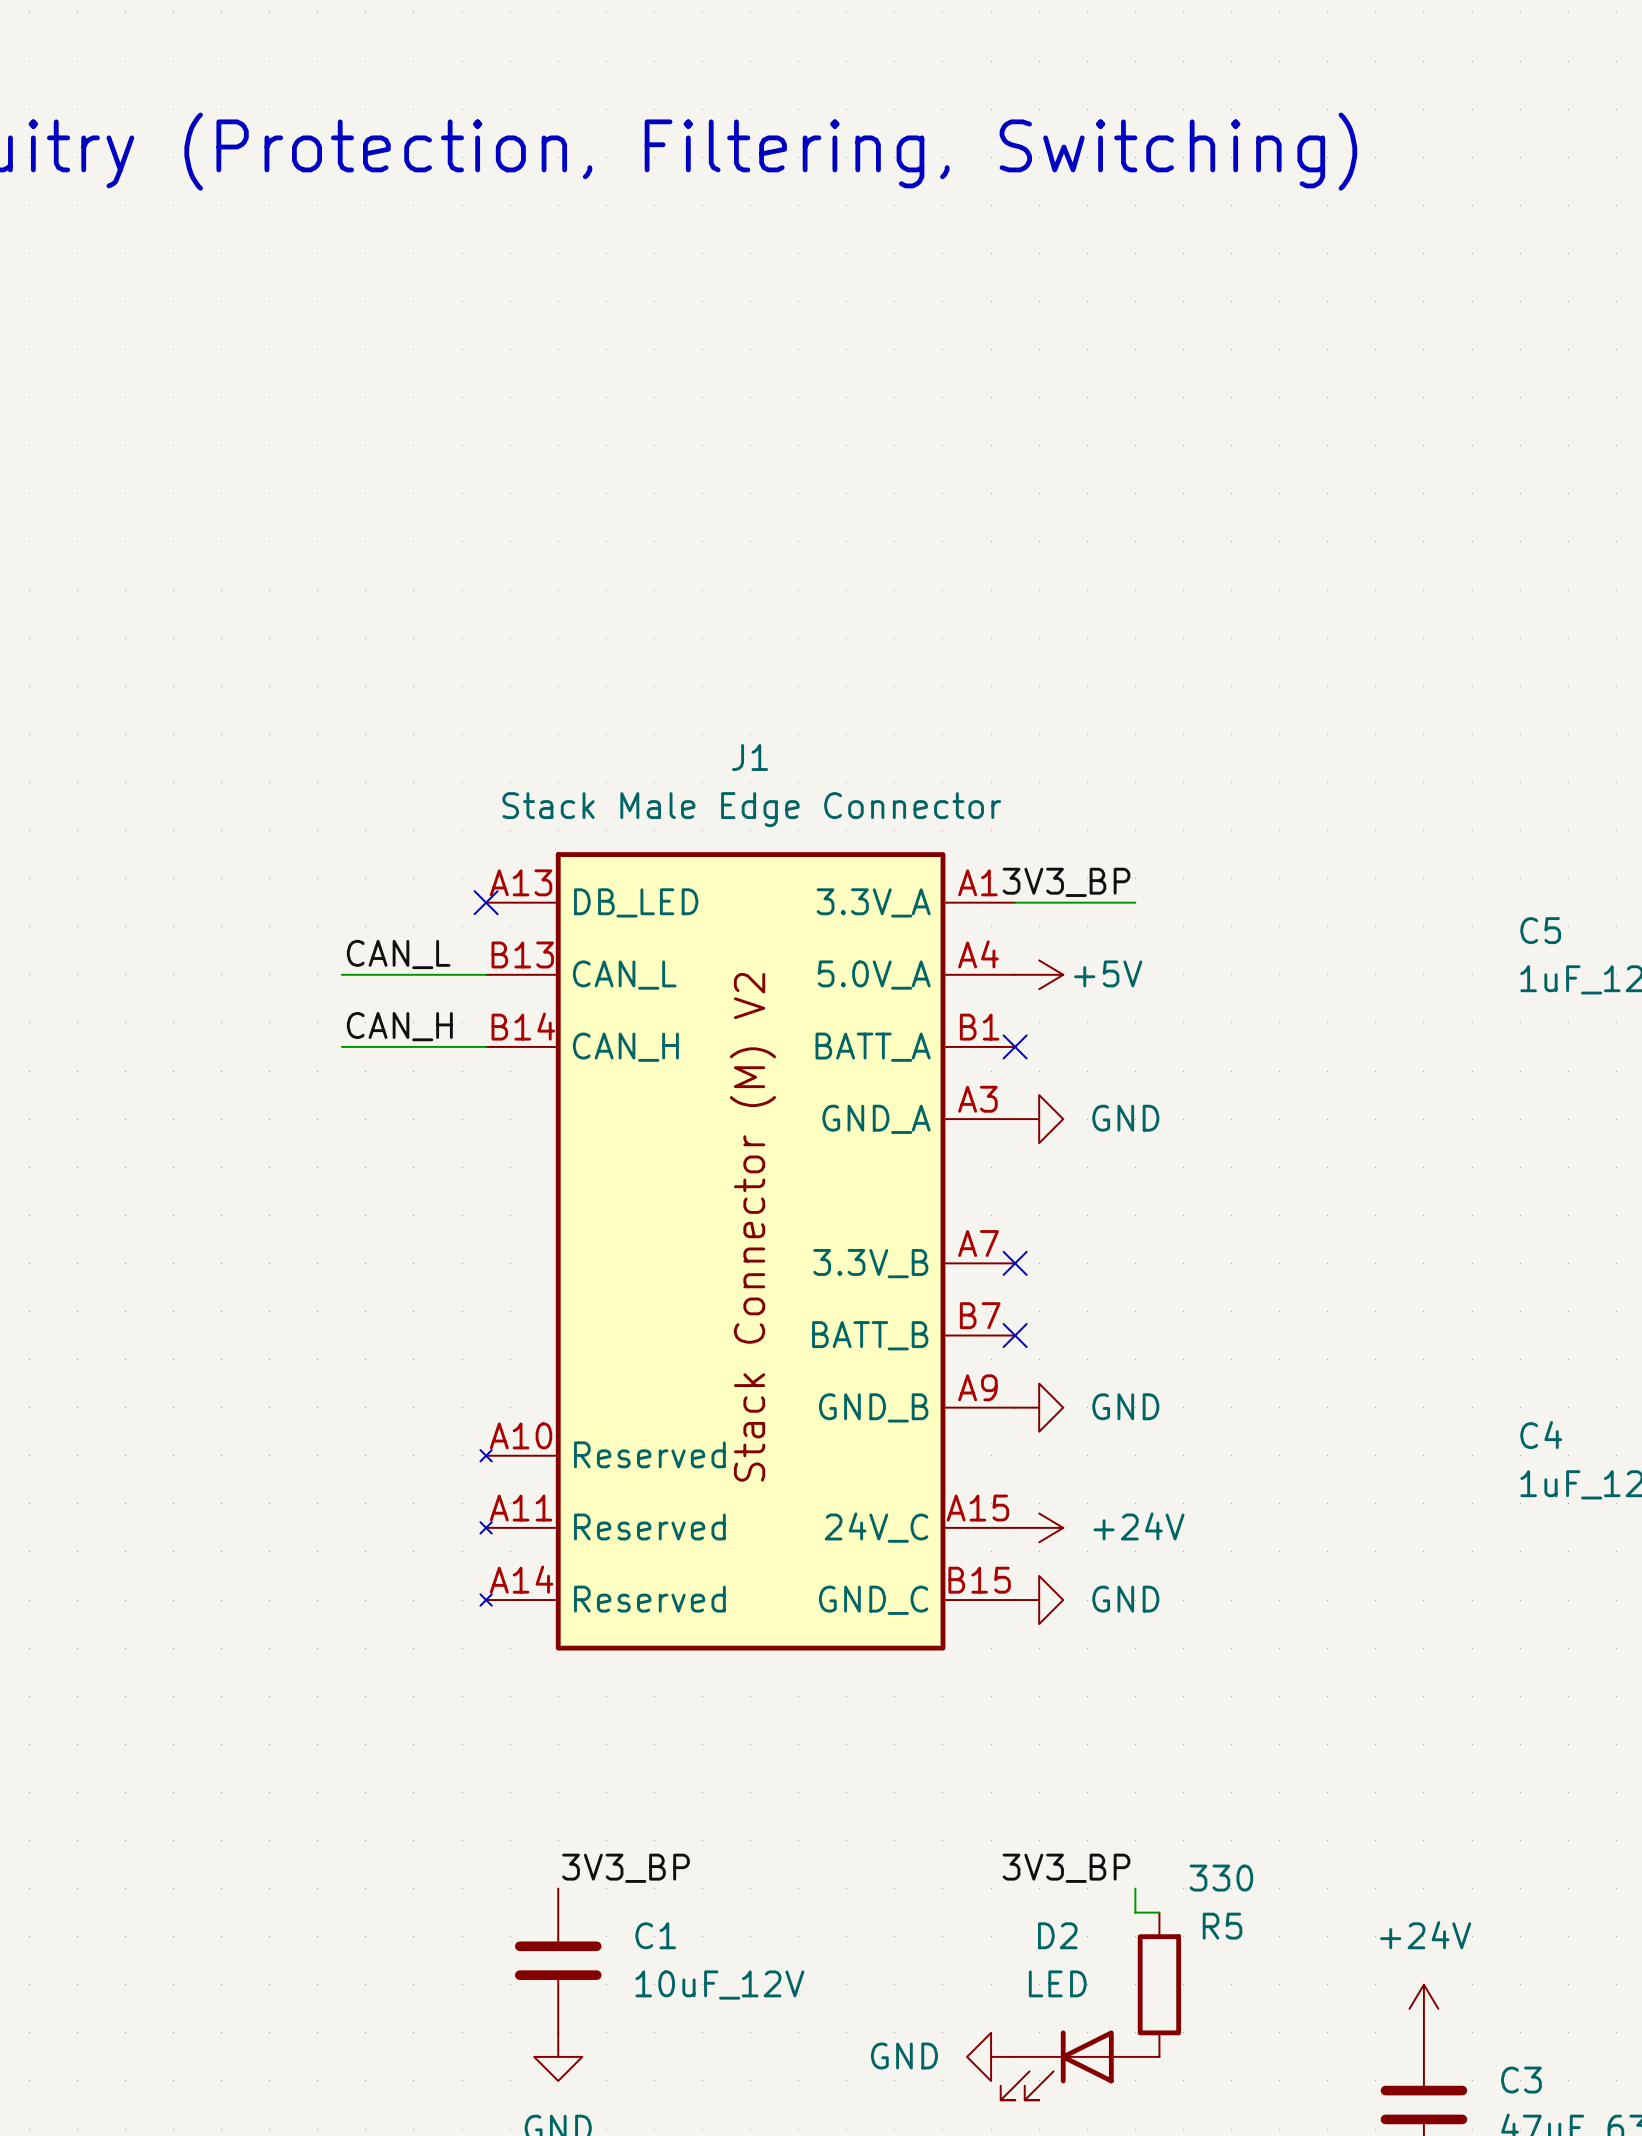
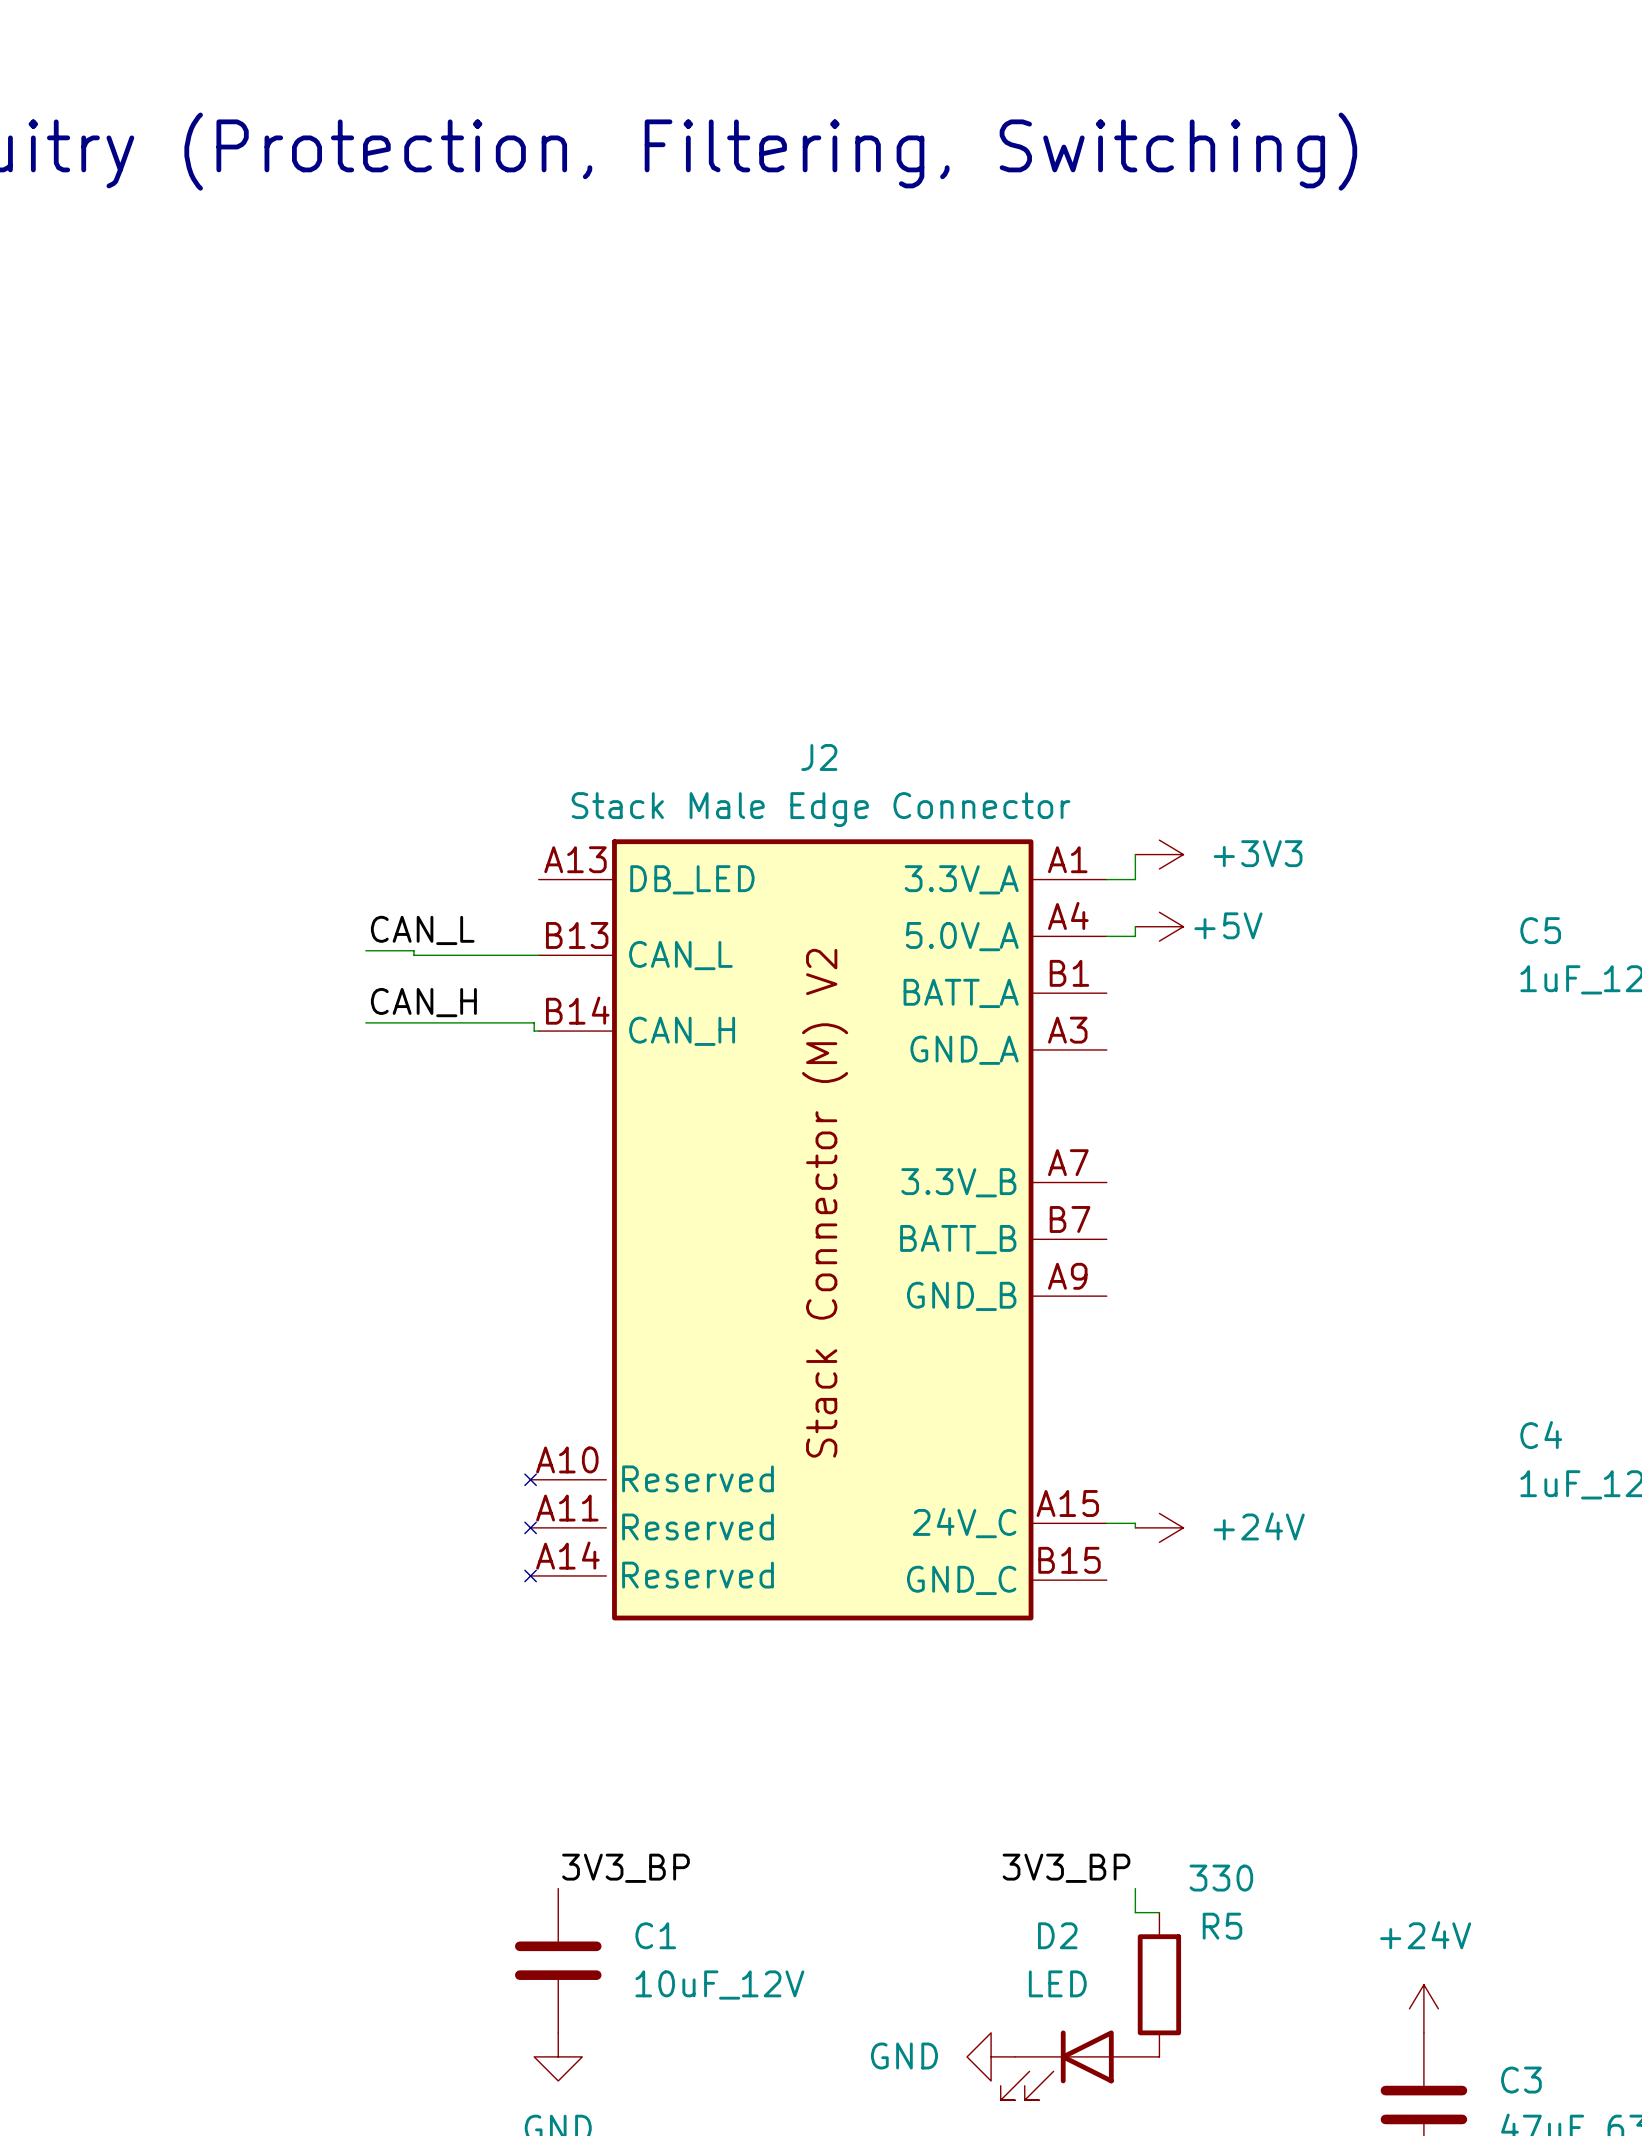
wire: none -> (1135, 854) (1135, 879) (1106, 879)
power symbol: none -> +3V3 (1159, 854)
label: 3V3_BP (1066, 882) -> none
no-connect mark: (486, 902) -> none
wire: (1015, 902) (1135, 902) -> none
wire: none -> (1135, 926) (1135, 936) (1106, 936)
wire: none -> (365, 950) (413, 950) (413, 955) (538, 955)
label position: CAN_L (398, 954) -> CAN_L (422, 930)
wire: (341, 974) (486, 974) -> none
power symbol position: +5V (1039, 974) -> +5V (1159, 926)
wire: none -> (365, 1022) (534, 1022) (534, 1031) (538, 1031)
label position: CAN_H (399, 1026) -> CAN_H (423, 1002)
wire: (341, 1046) (486, 1046) -> none
no-connect mark: (1015, 1046) -> none
power symbol: GND (1039, 1119) -> none
J2: none -> Stack Male Edge Connector (815, 1229)
J1: Stack Male Edge Connector (747, 1251) -> none
no-connect mark: (1015, 1263) -> none
no-connect mark: (1015, 1335) -> none
power symbol: GND (1039, 1407) -> none
wire: none -> (1106, 1523) (1135, 1523) (1135, 1527)
power symbol position: +24V (1039, 1527) -> +24V (1159, 1527)
power symbol: GND (1039, 1600) -> none

